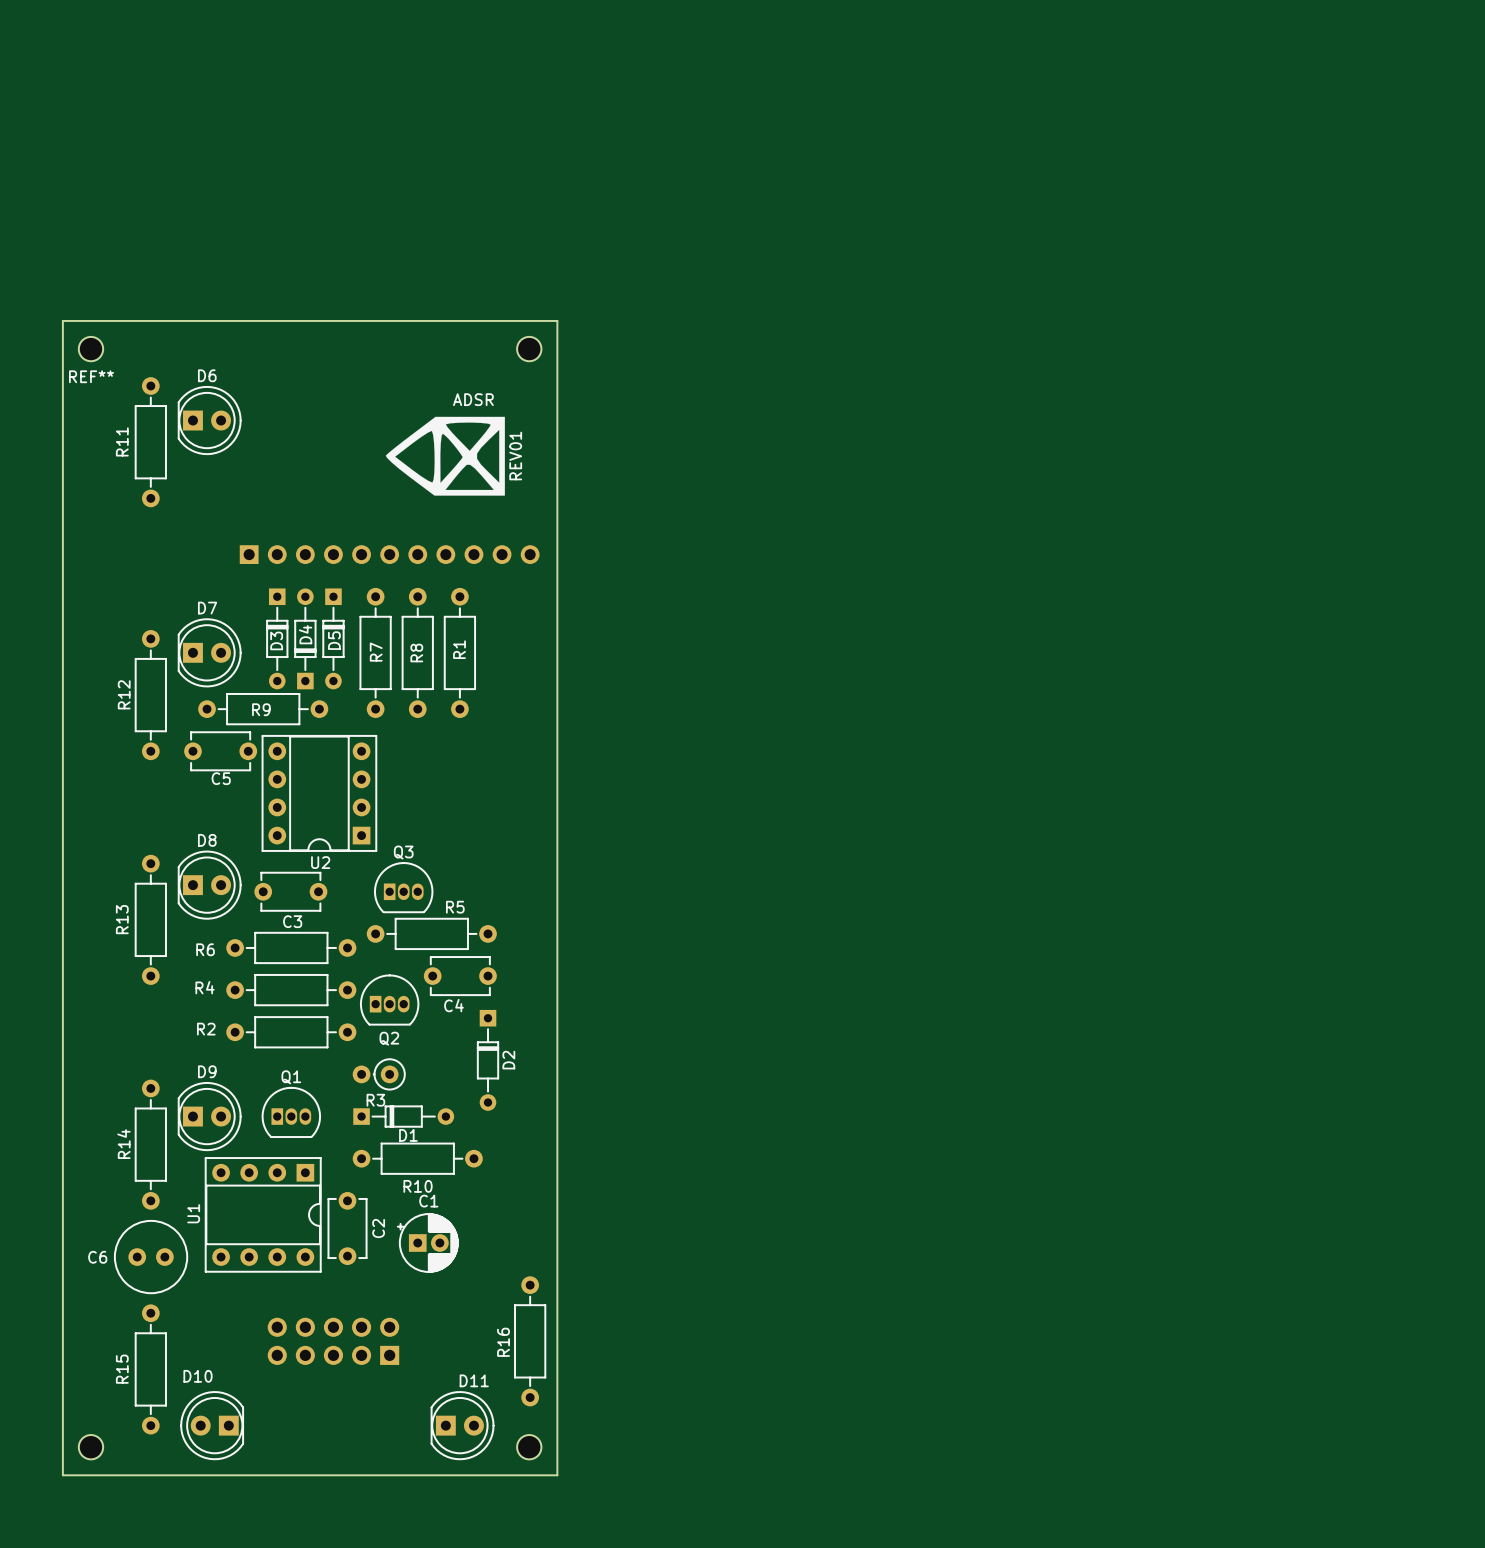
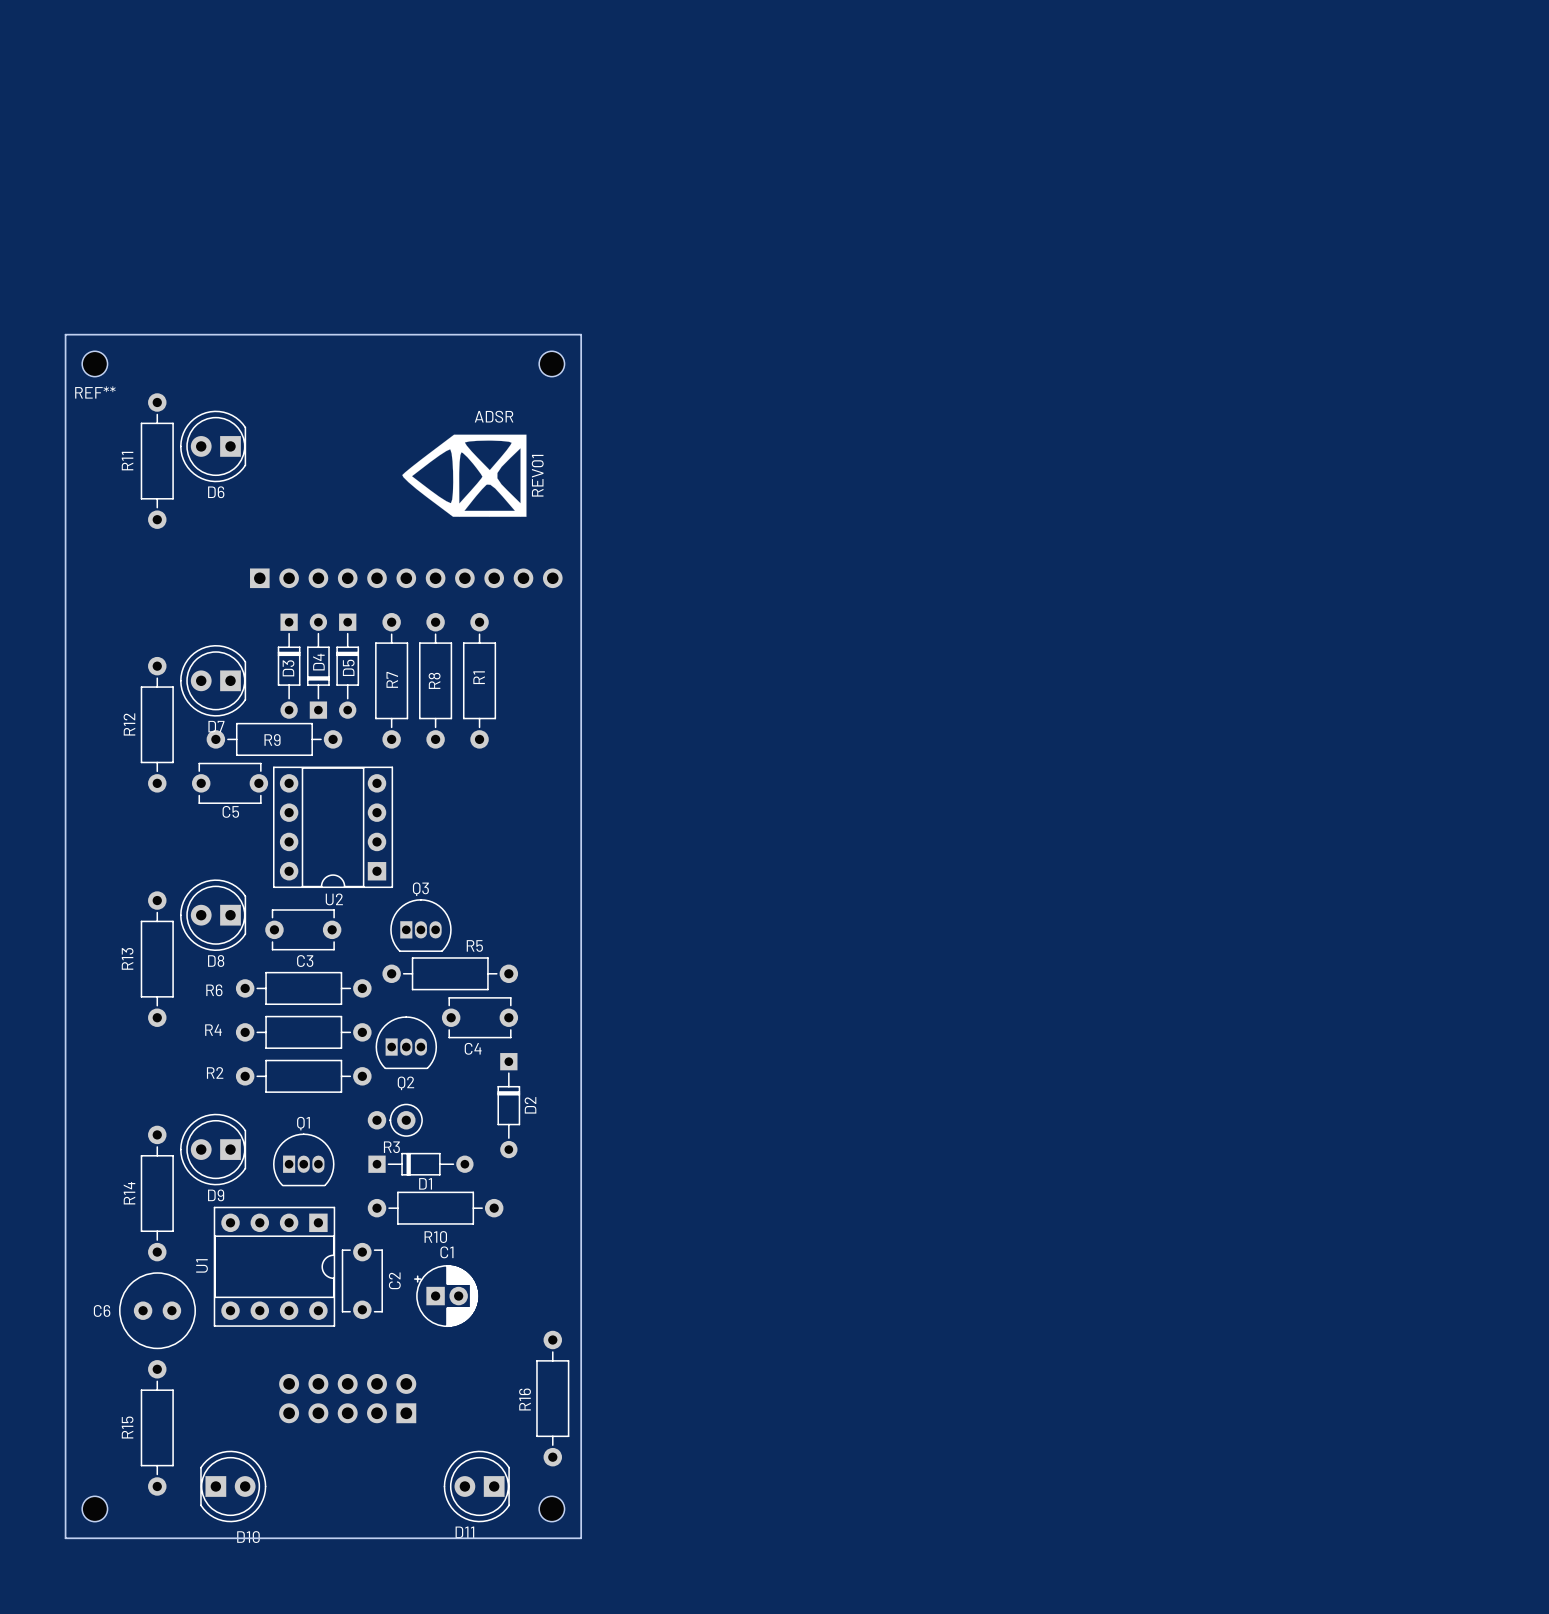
D6 rotation: 0° (209, 420) -> 180° (213, 446)
D7 rotation: 0° (209, 652) -> 180° (213, 680)
D8 rotation: 0° (209, 885) -> 180° (213, 915)
D9 rotation: 0° (209, 1116) -> 180° (213, 1149)
D10 rotation: 0° (212, 1425) -> 180° (233, 1486)
D11 rotation: 0° (462, 1425) -> 180° (476, 1486)

